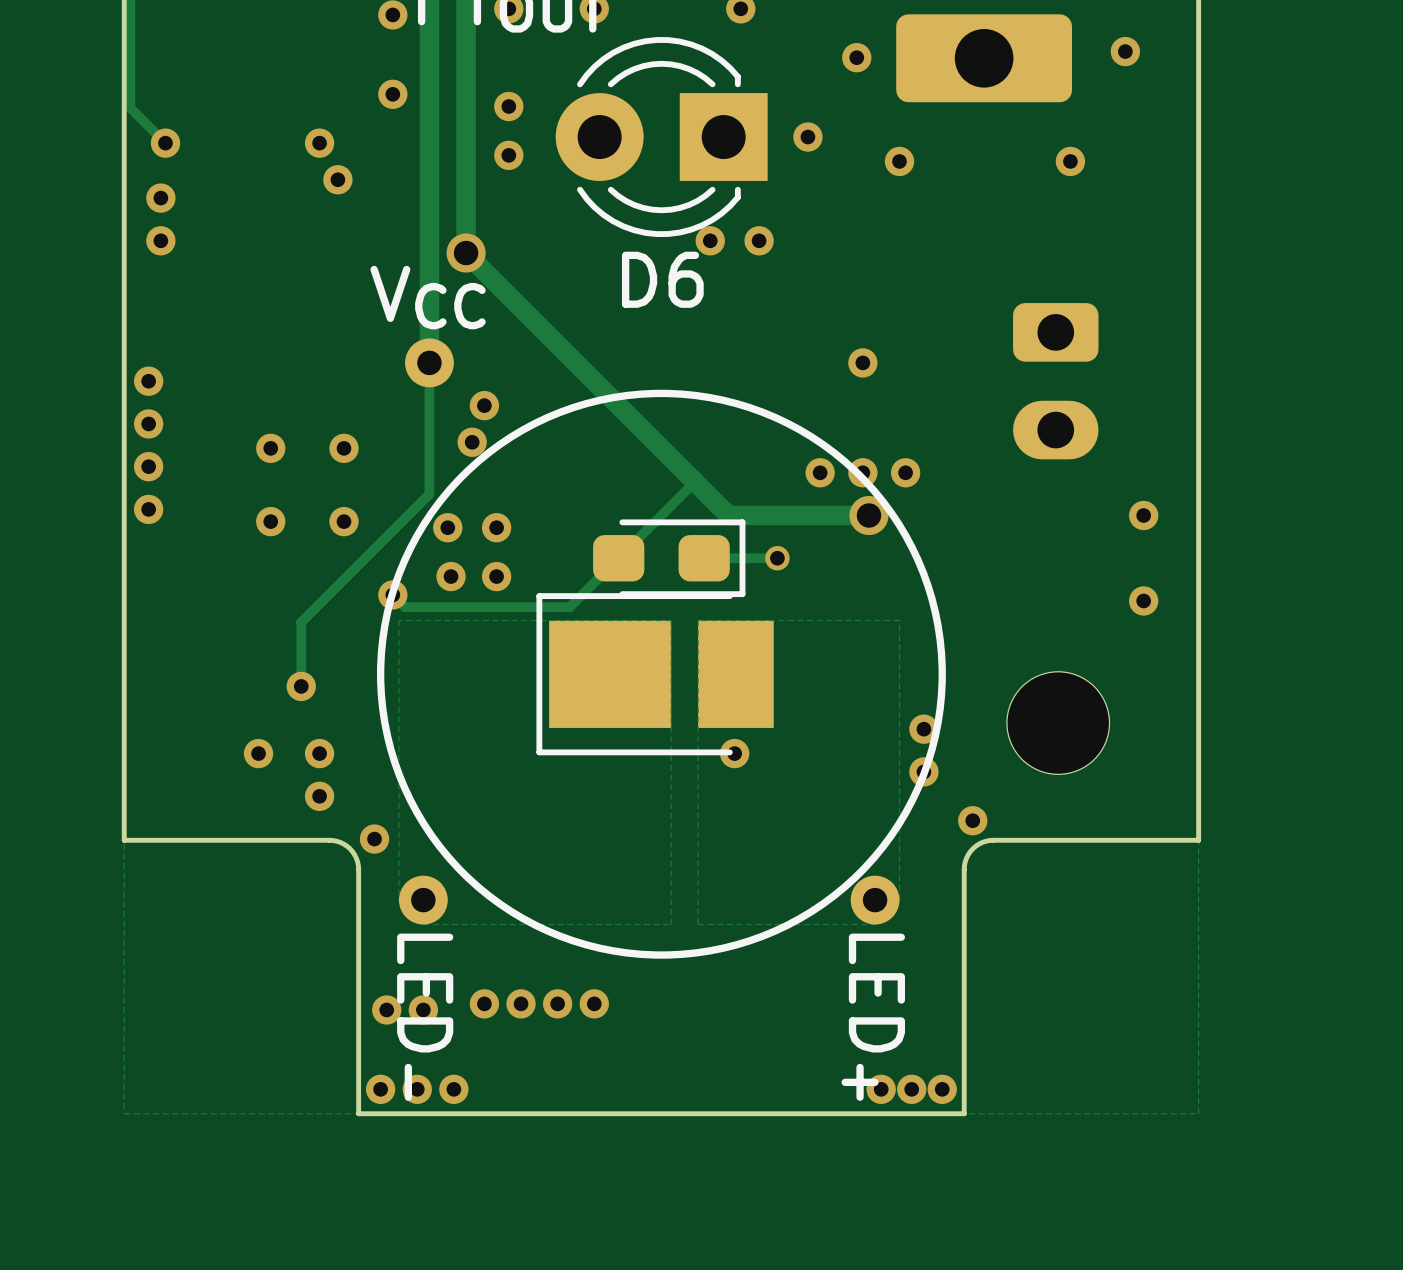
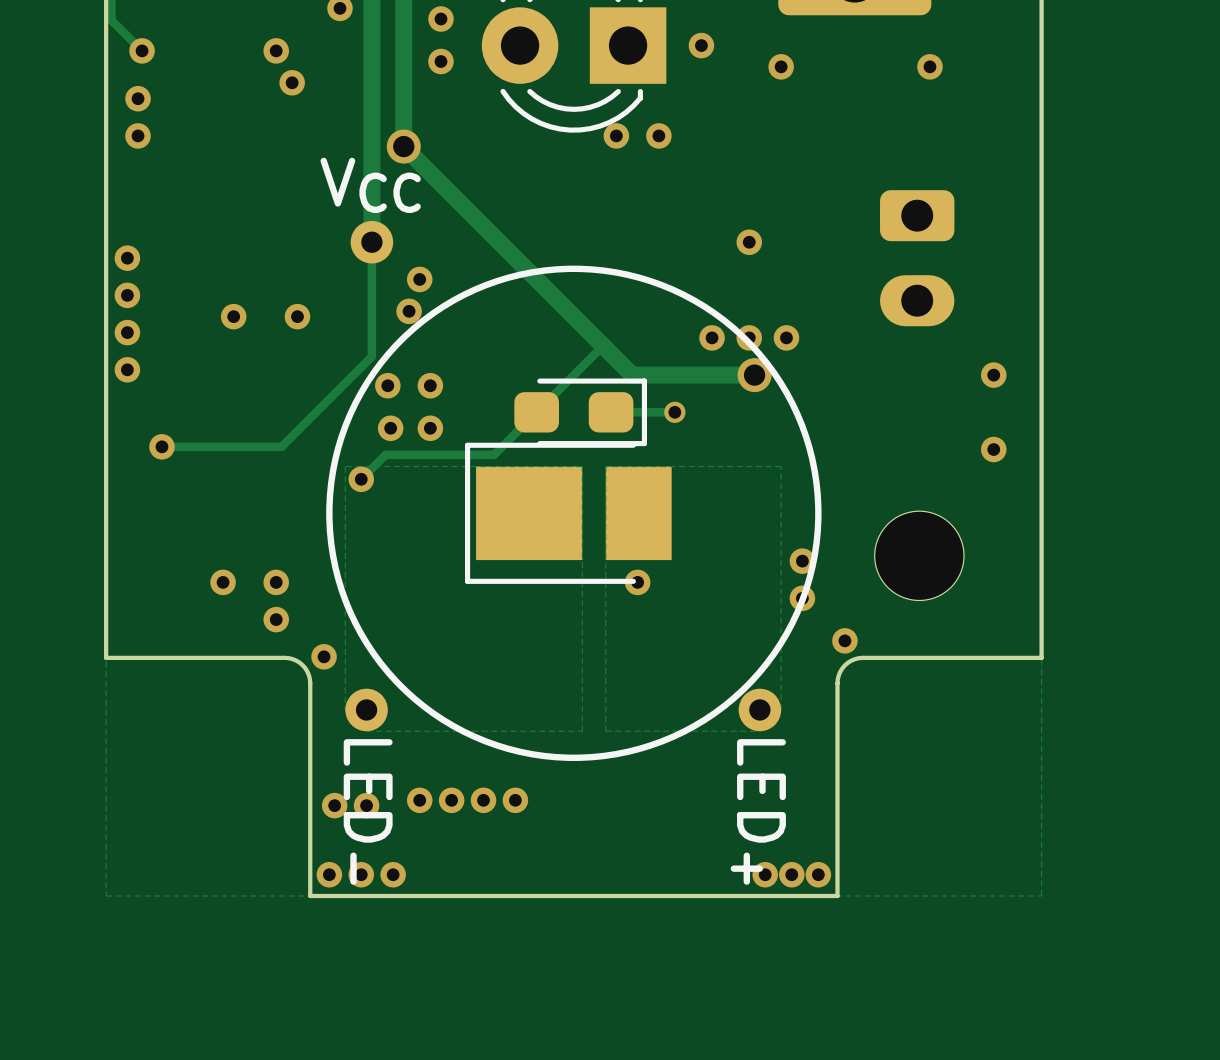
D6 name: D6 (662, 279) -> none
via: (270, 521) -> none
via: (344, 521) -> none
track: (392, 594) (404, 607) (445, 607) -> (361, 479) (385, 454)
via position: (392, 594) -> (361, 479)
via: none -> (161, 446)
track: (325, 597) (301, 622) (301, 686) -> (281, 446) (161, 446)
via: (301, 686) -> none

